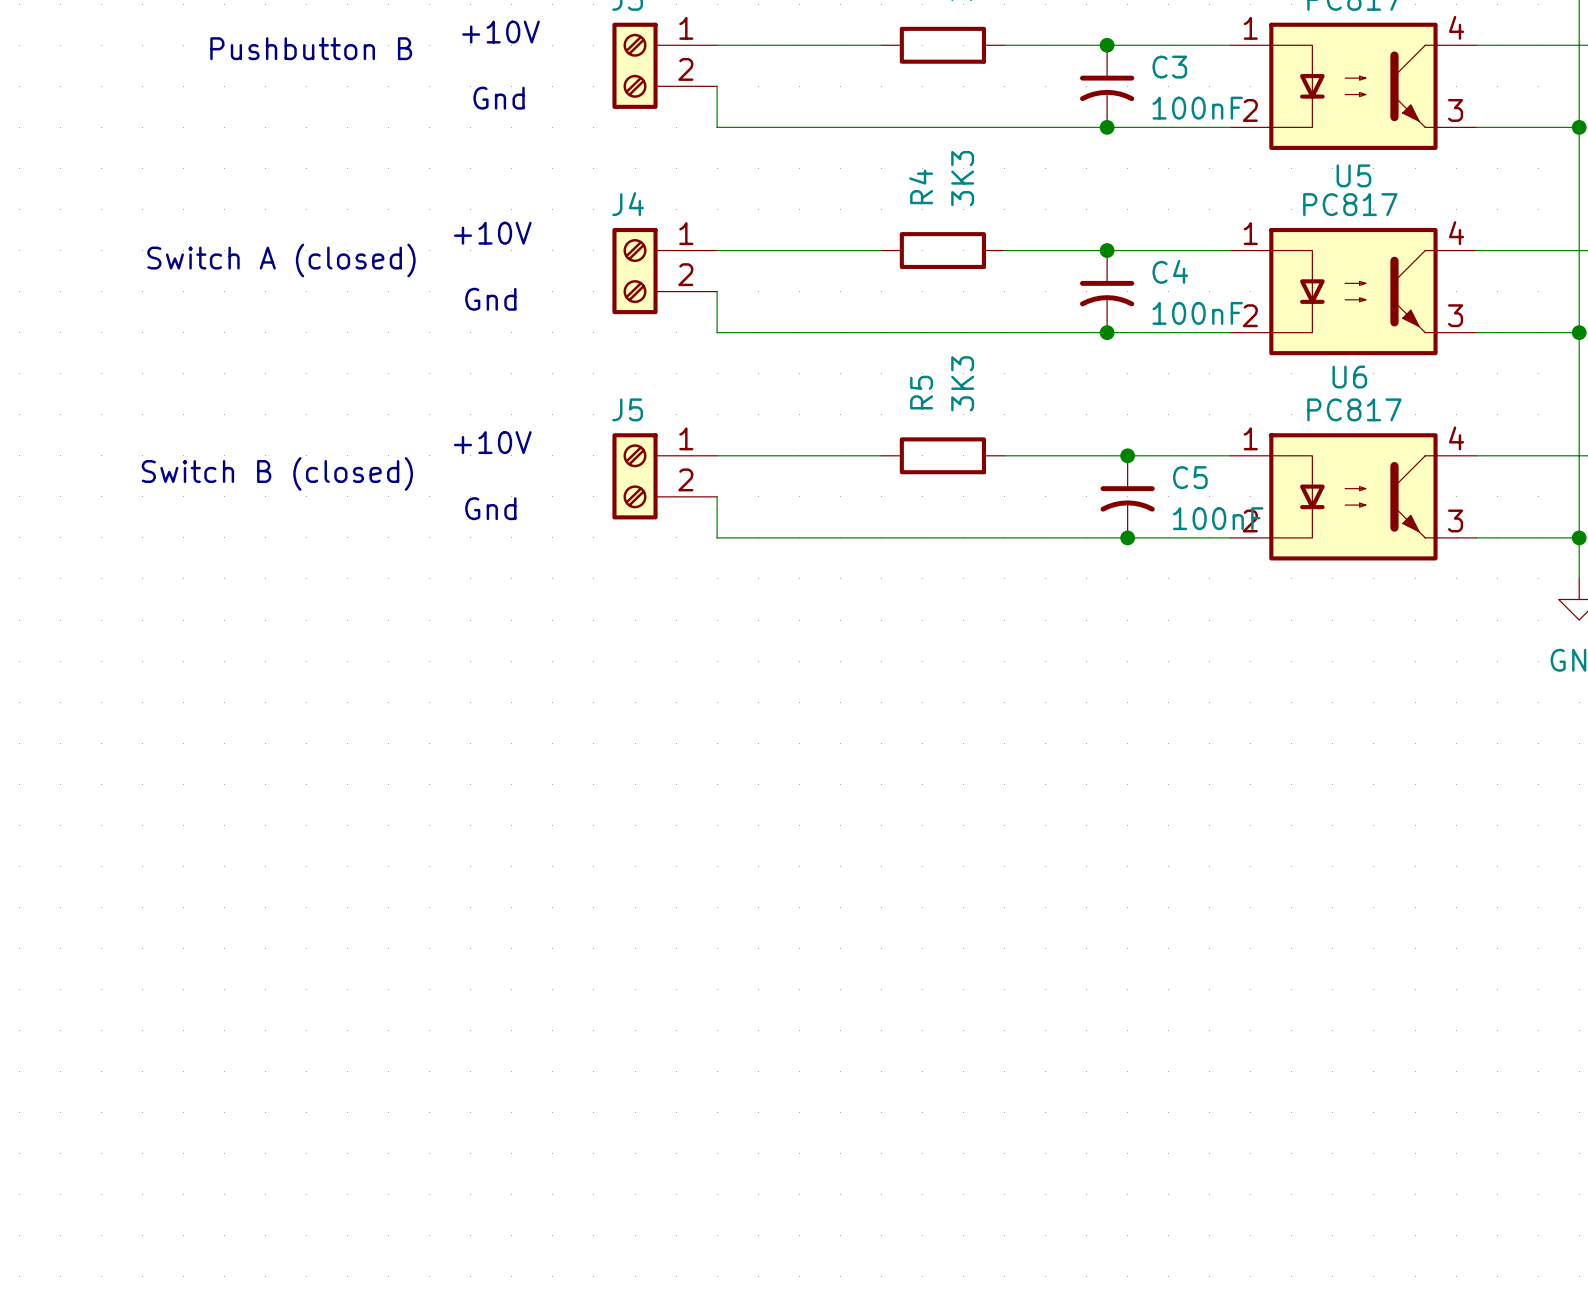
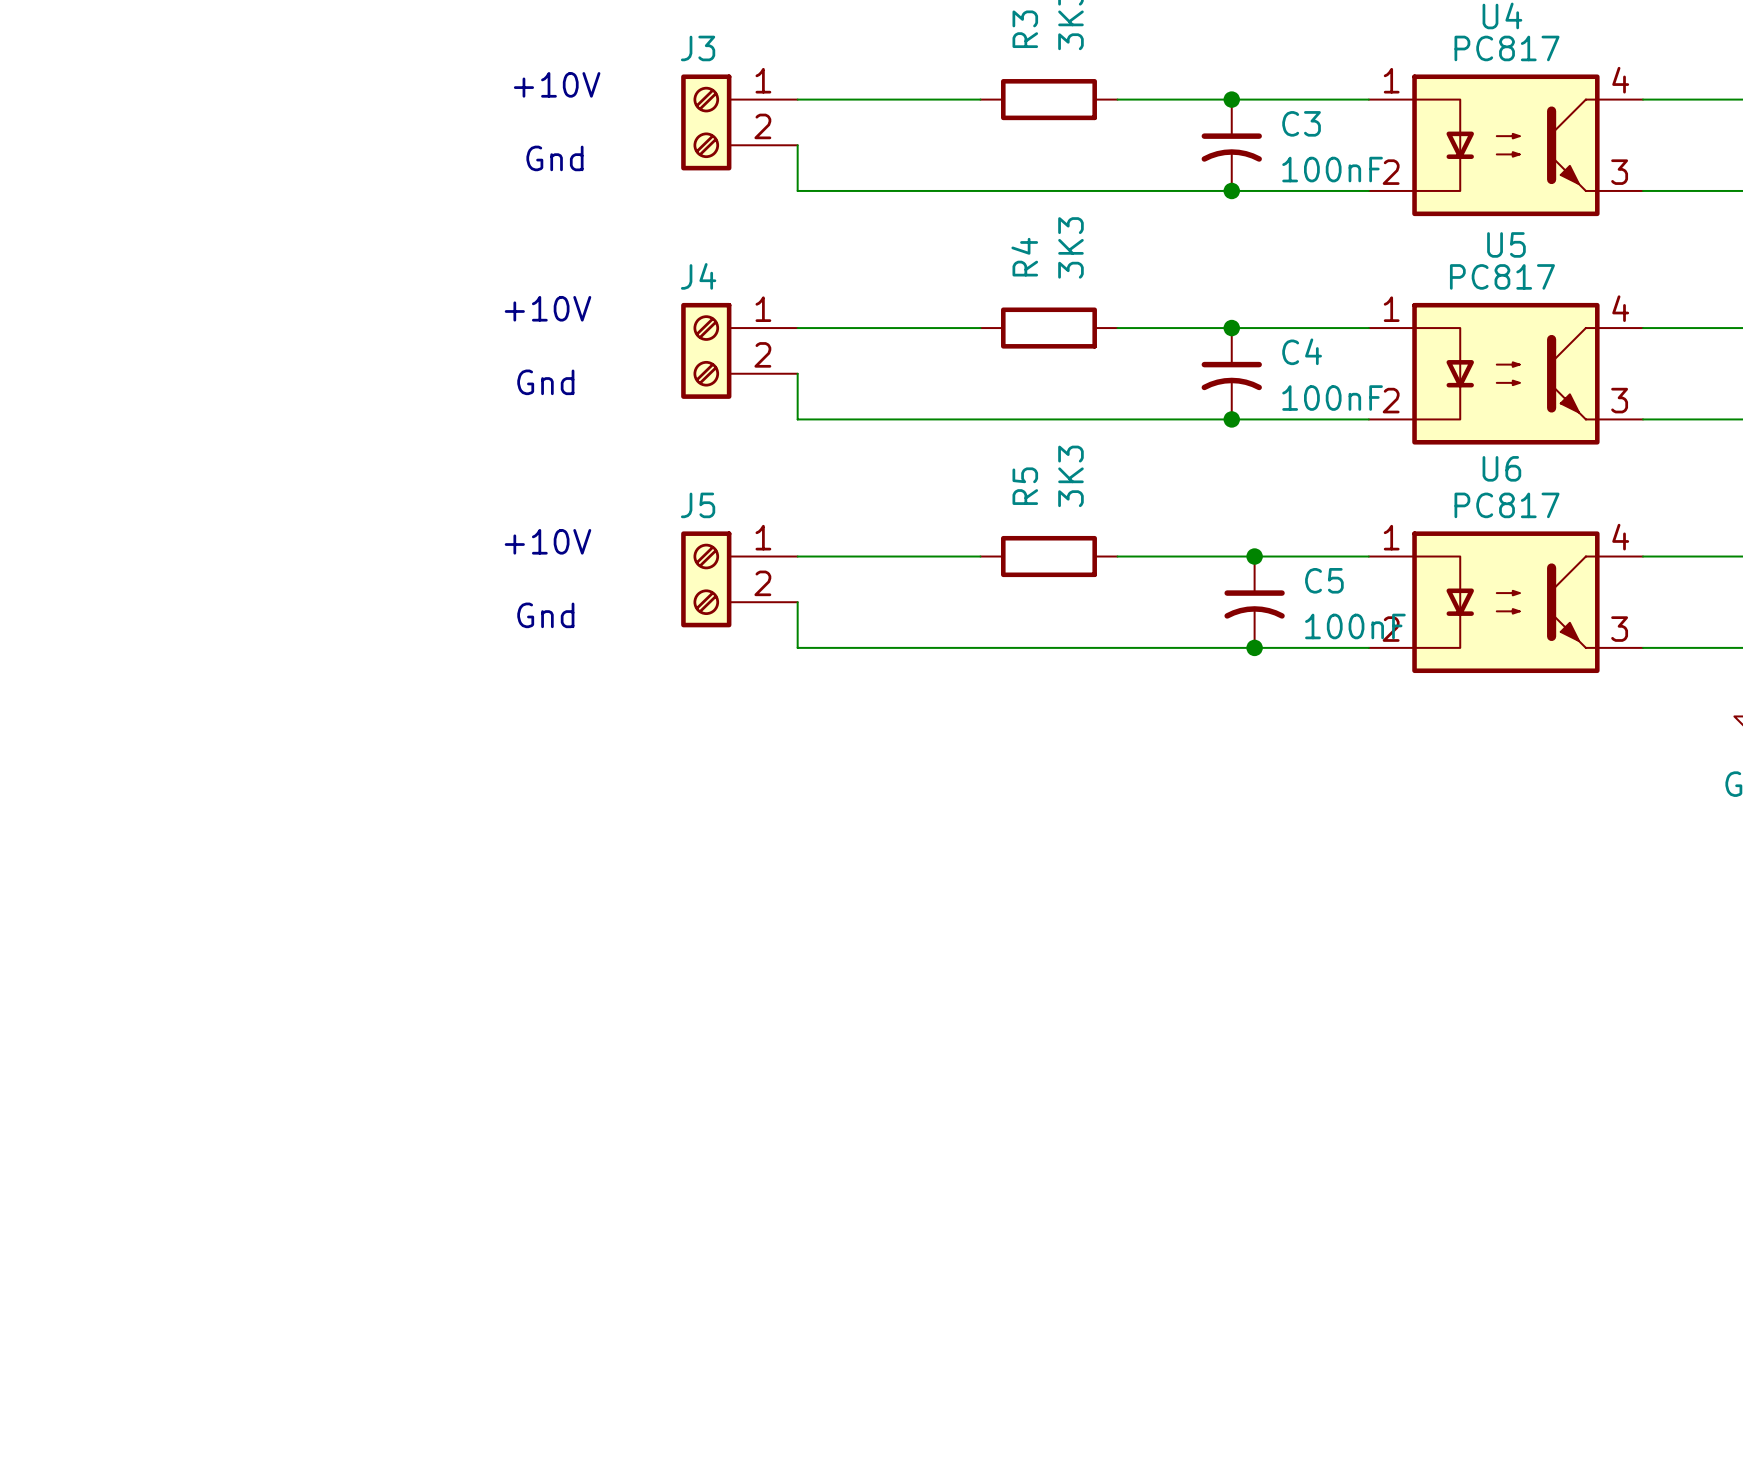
text: Pushbutton B (311, 48) -> none
text: Switch A (closed) (281, 260) -> none
text: Switch B (closed) (277, 473) -> none

